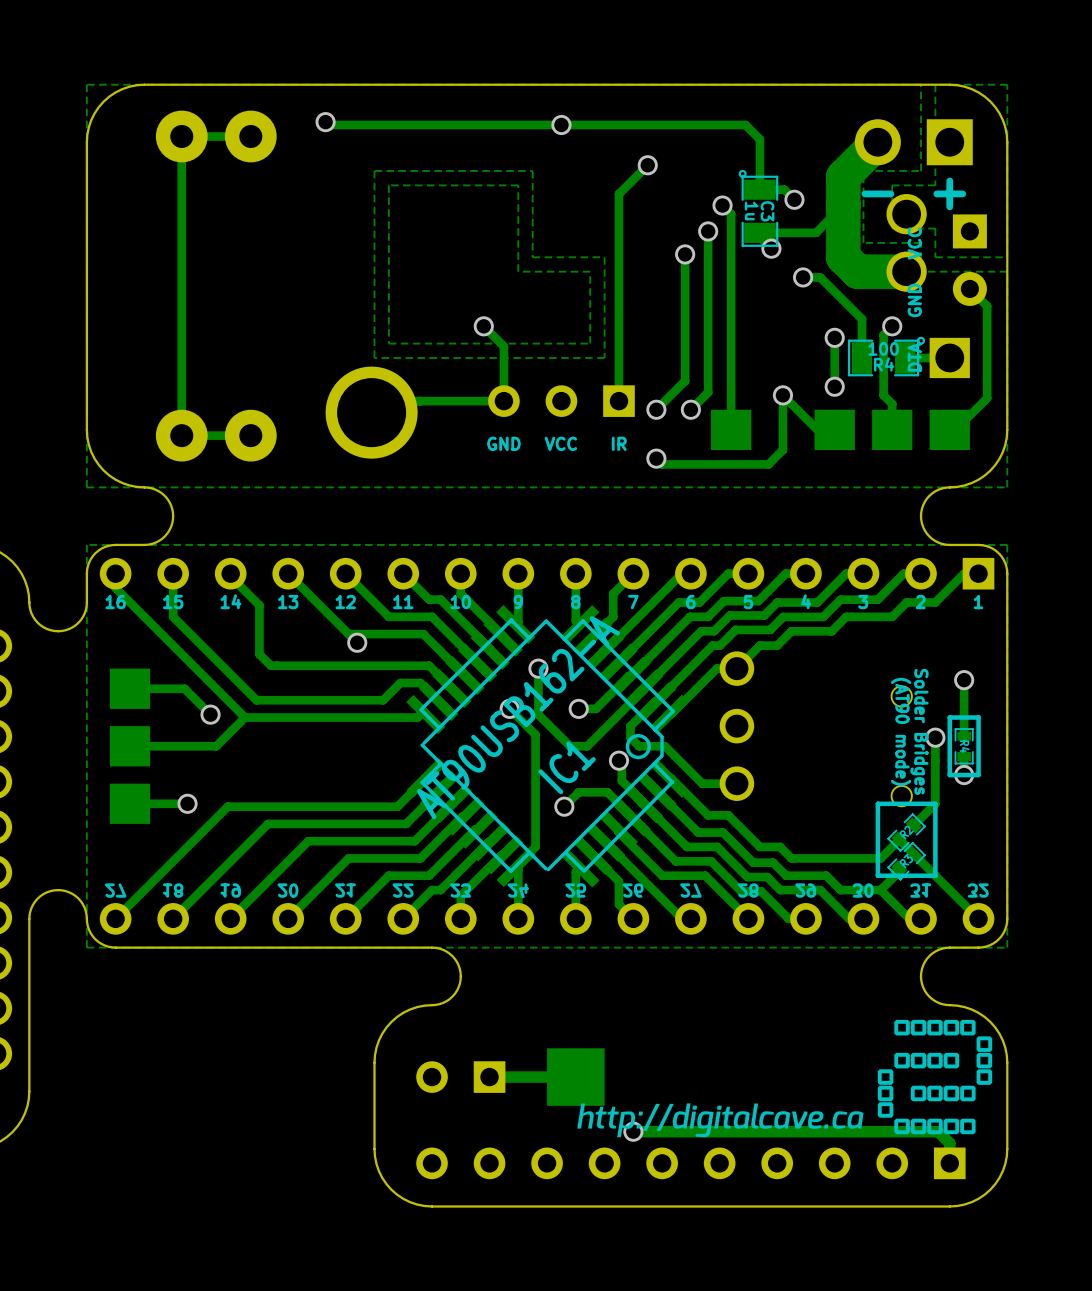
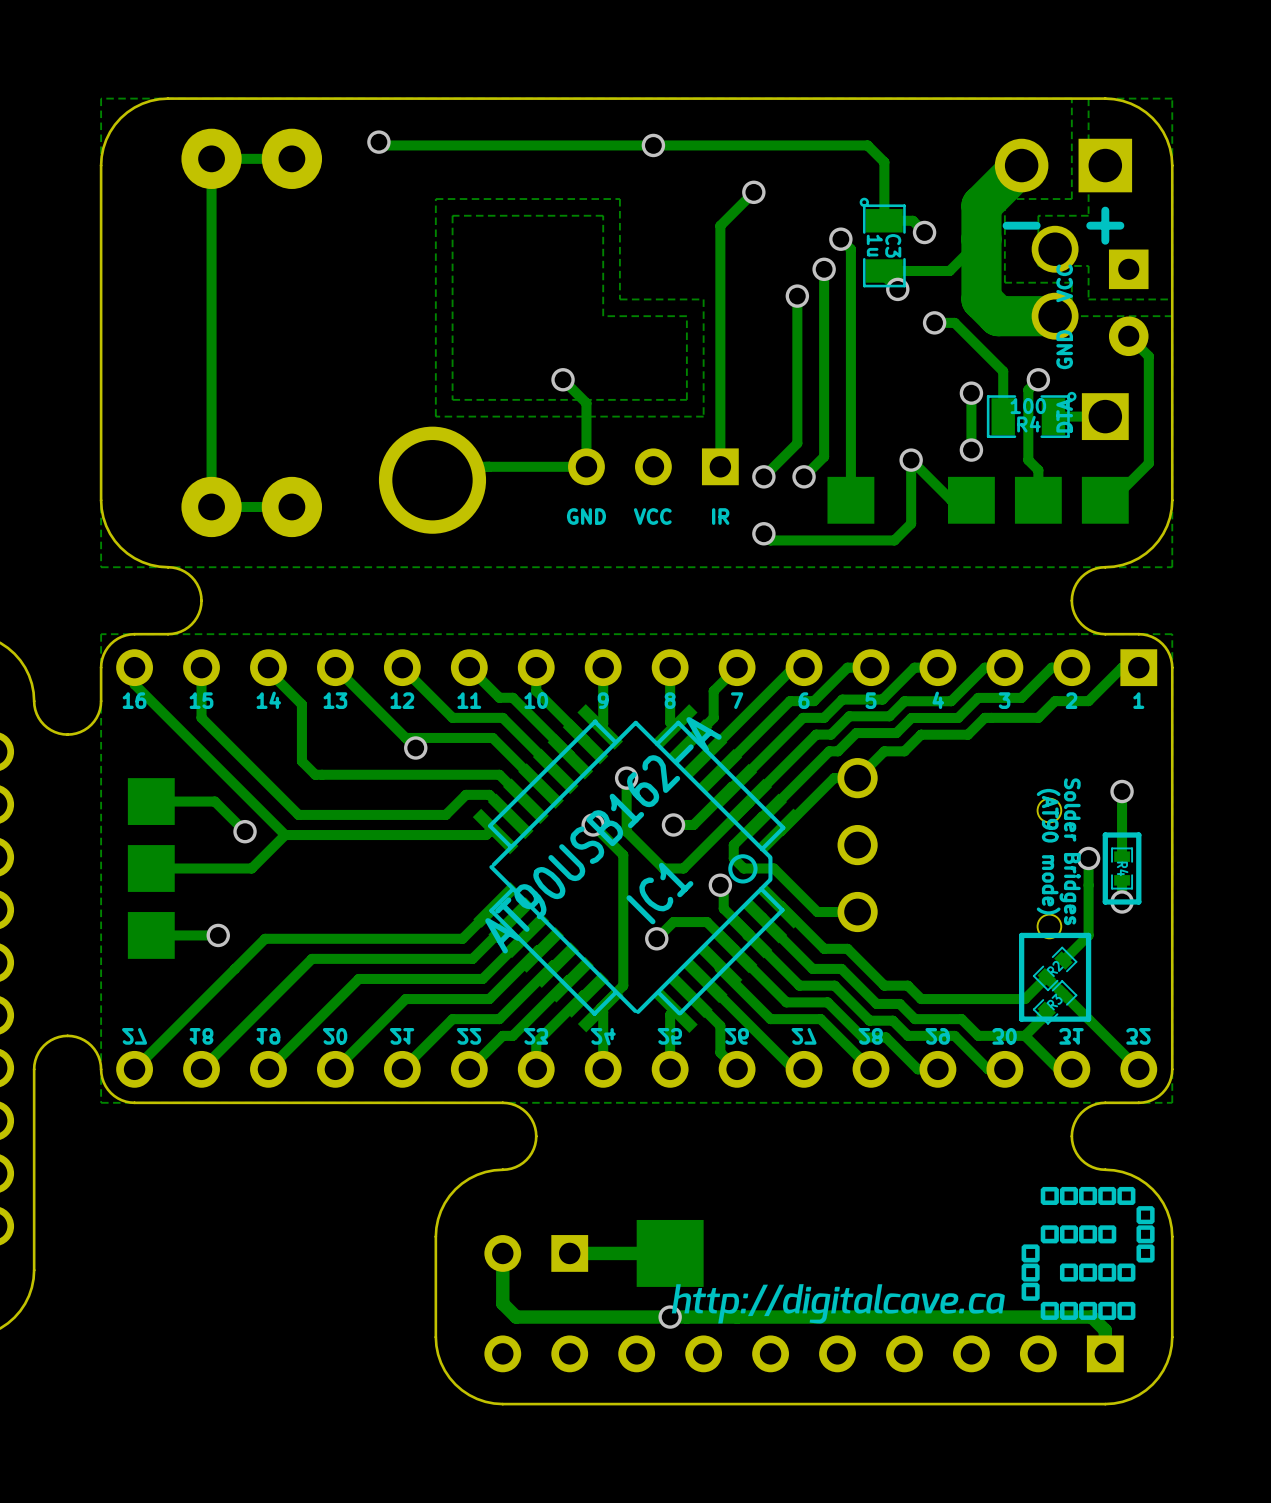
track: none -> (502, 1253) (502, 1303) (516, 1317) (737, 1317)
via position: (633, 1131) -> (670, 1317)

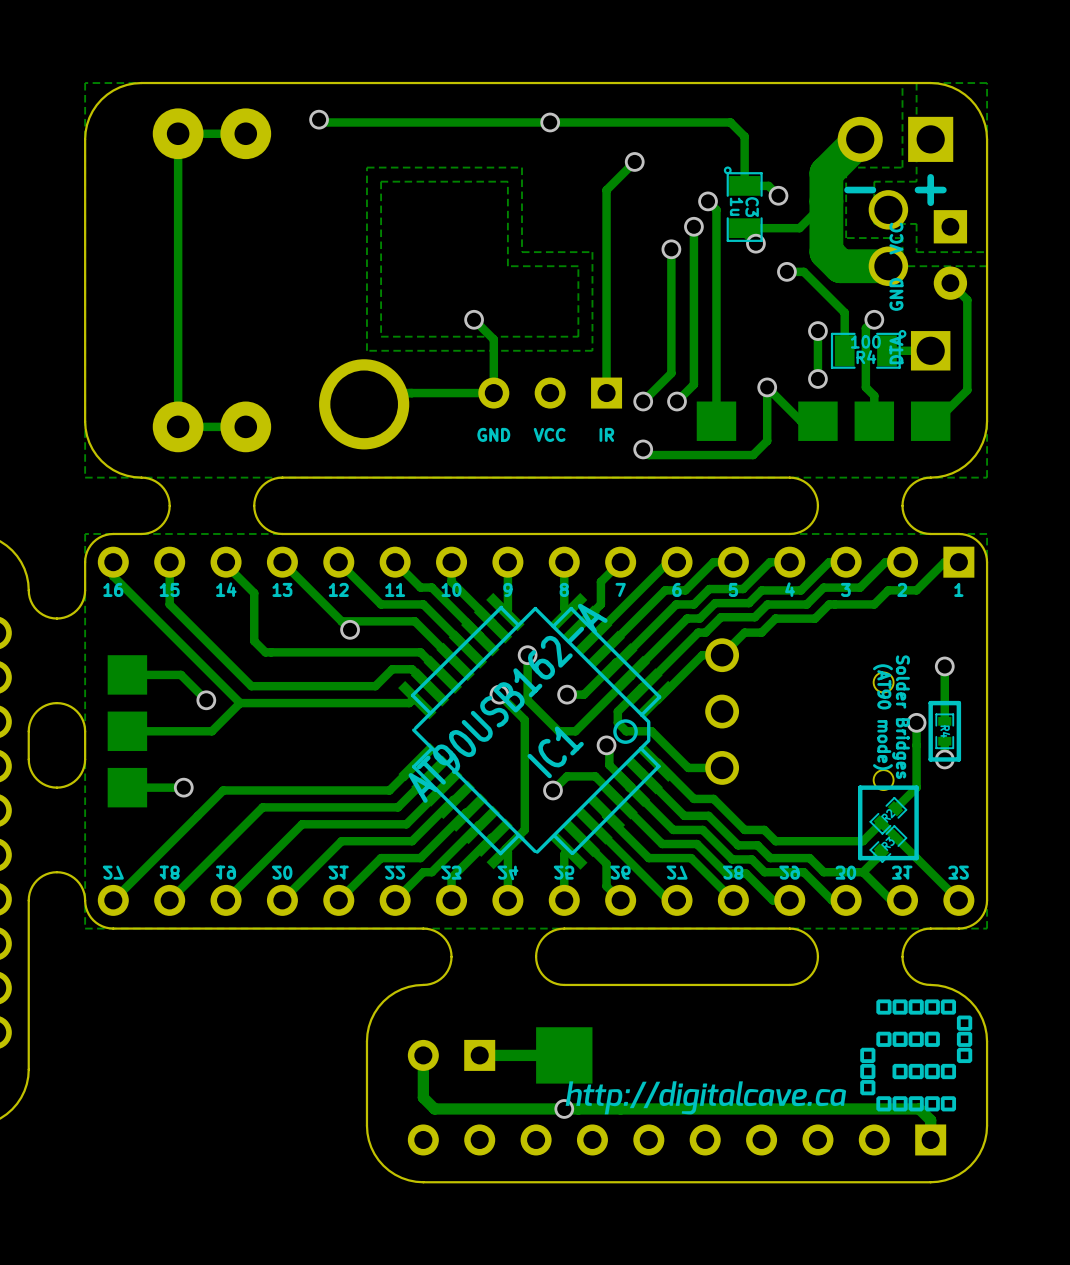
board edge: none -> (789, 477) (282, 477) (271, 479) (262, 485) (256, 495) (254, 505) (256, 516) (262, 525) (271, 531) (282, 533) (789, 533) (800, 531) (809, 525) (815, 516) (817, 505) (815, 495) (809, 485) (800, 479) (789, 477)
board edge: none -> (56, 703) (46, 705) (37, 711) (30, 720) (28, 731) (28, 763) (32, 773) (42, 783) (56, 787) (67, 785) (76, 779) (82, 770) (85, 759) (84, 727) (81, 717) (71, 706) (56, 703)
board edge: none -> (789, 928) (560, 928) (550, 932) (541, 939) (537, 949) (536, 960) (544, 976) (560, 984) (793, 984) (803, 981) (812, 973) (816, 964) (817, 953) (809, 936) (800, 930) (789, 928)

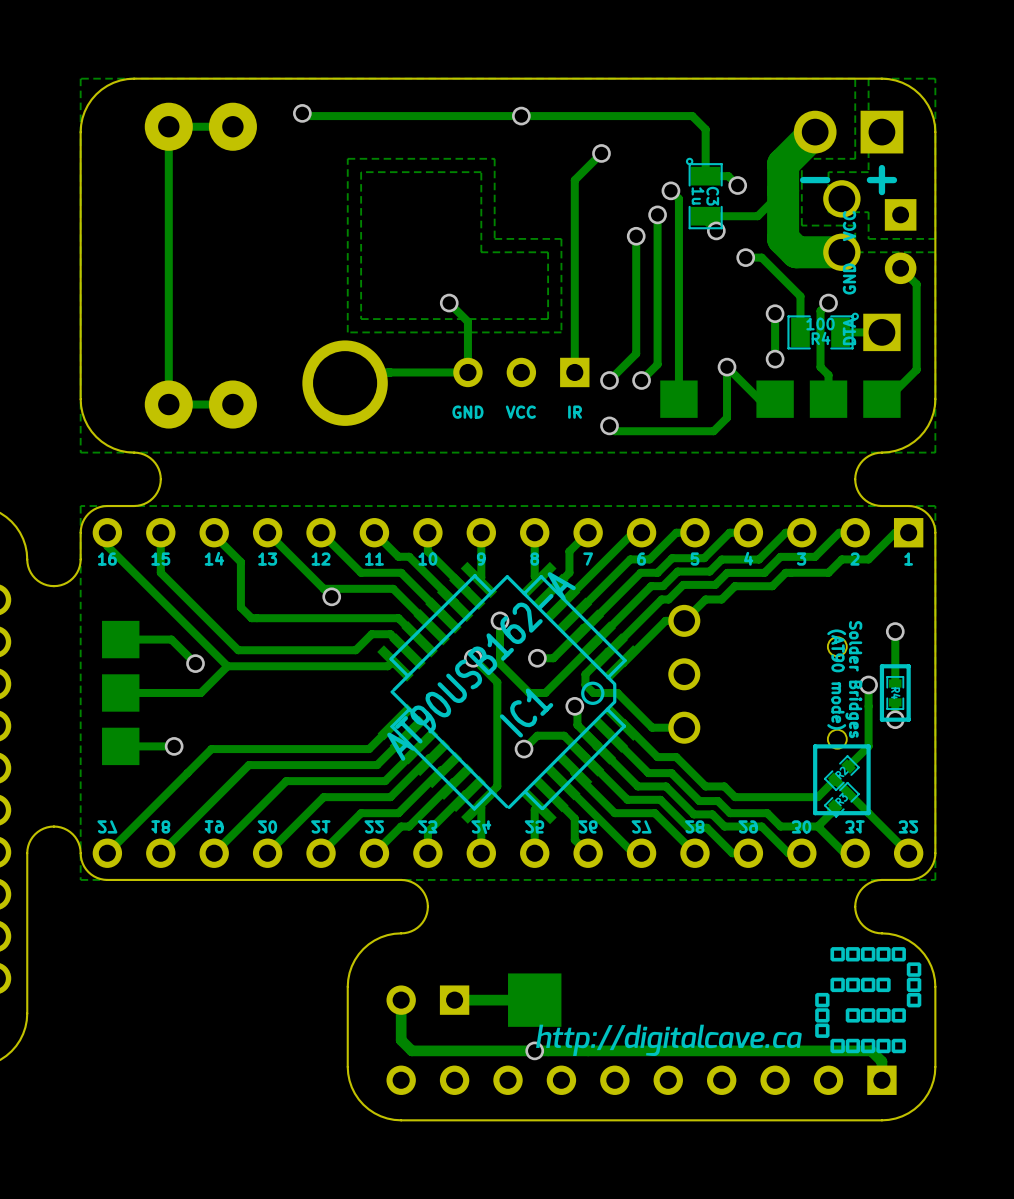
board edge: (789, 477) (282, 477) (271, 479) (262, 485) (256, 495) (254, 505) (256, 516) (262, 525) (271, 531) (282, 533) (789, 533) (800, 531) (809, 525) (815, 516) (817, 505) (815, 495) (809, 485) (800, 479) (789, 477) -> none
board edge: (56, 703) (46, 705) (37, 711) (30, 720) (28, 731) (28, 763) (32, 773) (42, 783) (56, 787) (67, 785) (76, 779) (82, 770) (85, 759) (84, 727) (81, 717) (71, 706) (56, 703) -> none
board edge: (789, 928) (560, 928) (550, 932) (541, 939) (537, 949) (536, 960) (544, 976) (560, 984) (793, 984) (803, 981) (812, 973) (816, 964) (817, 953) (809, 936) (800, 930) (789, 928) -> none

